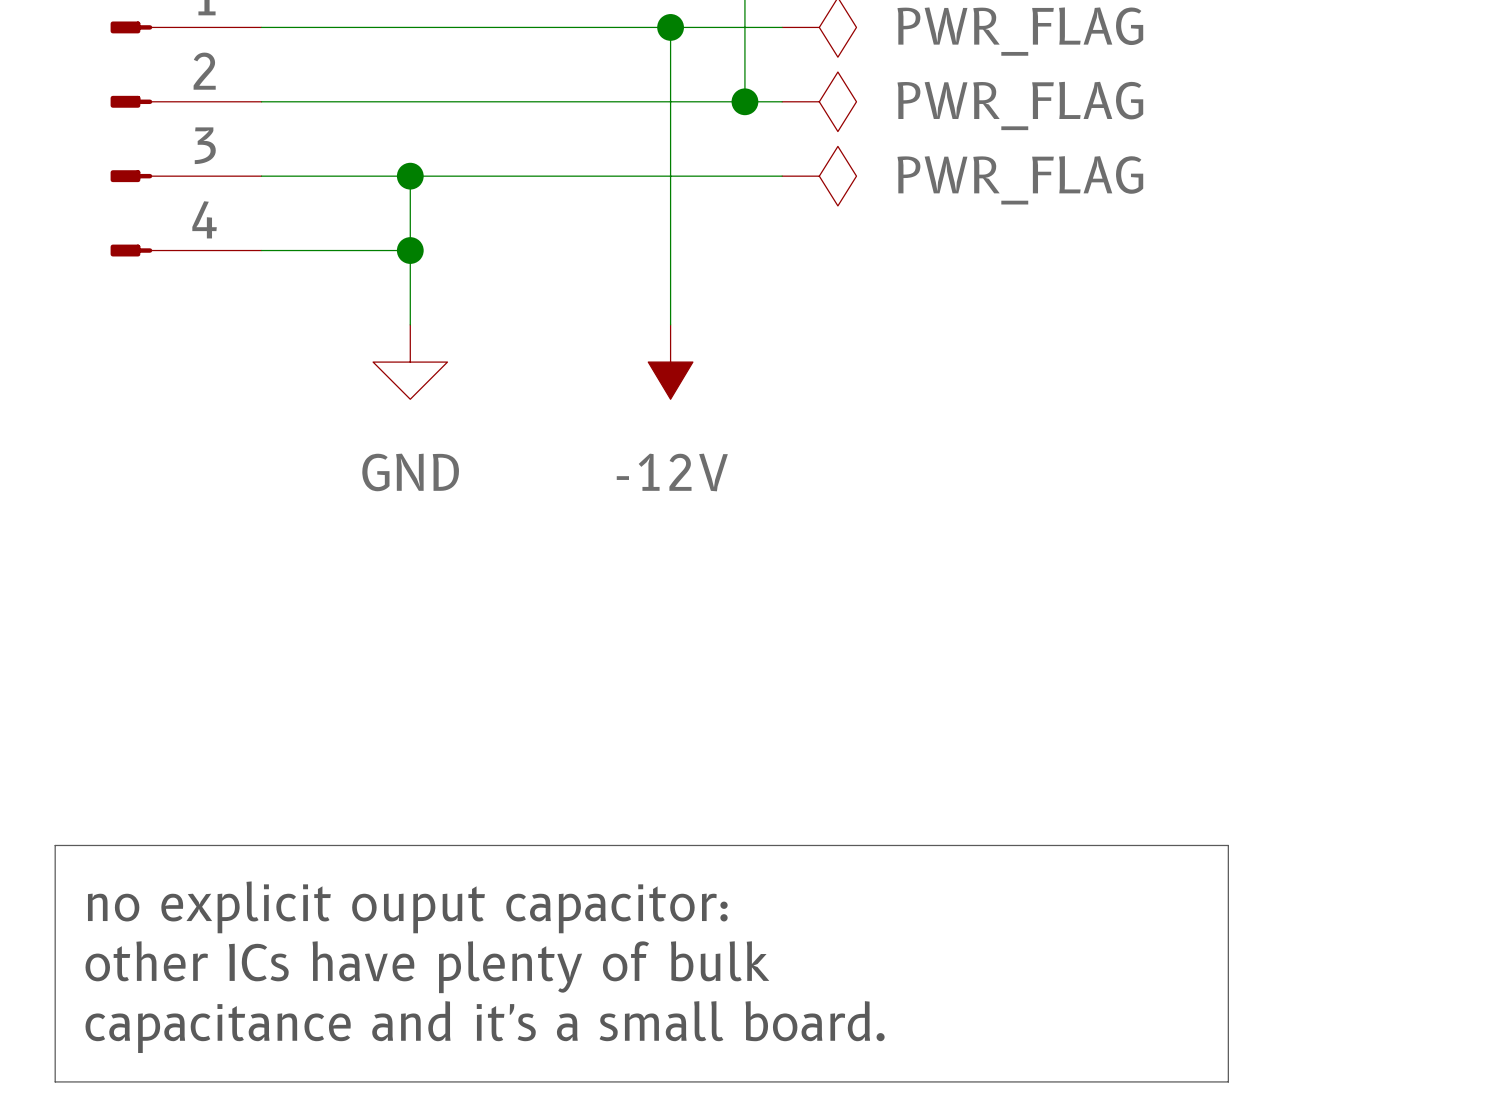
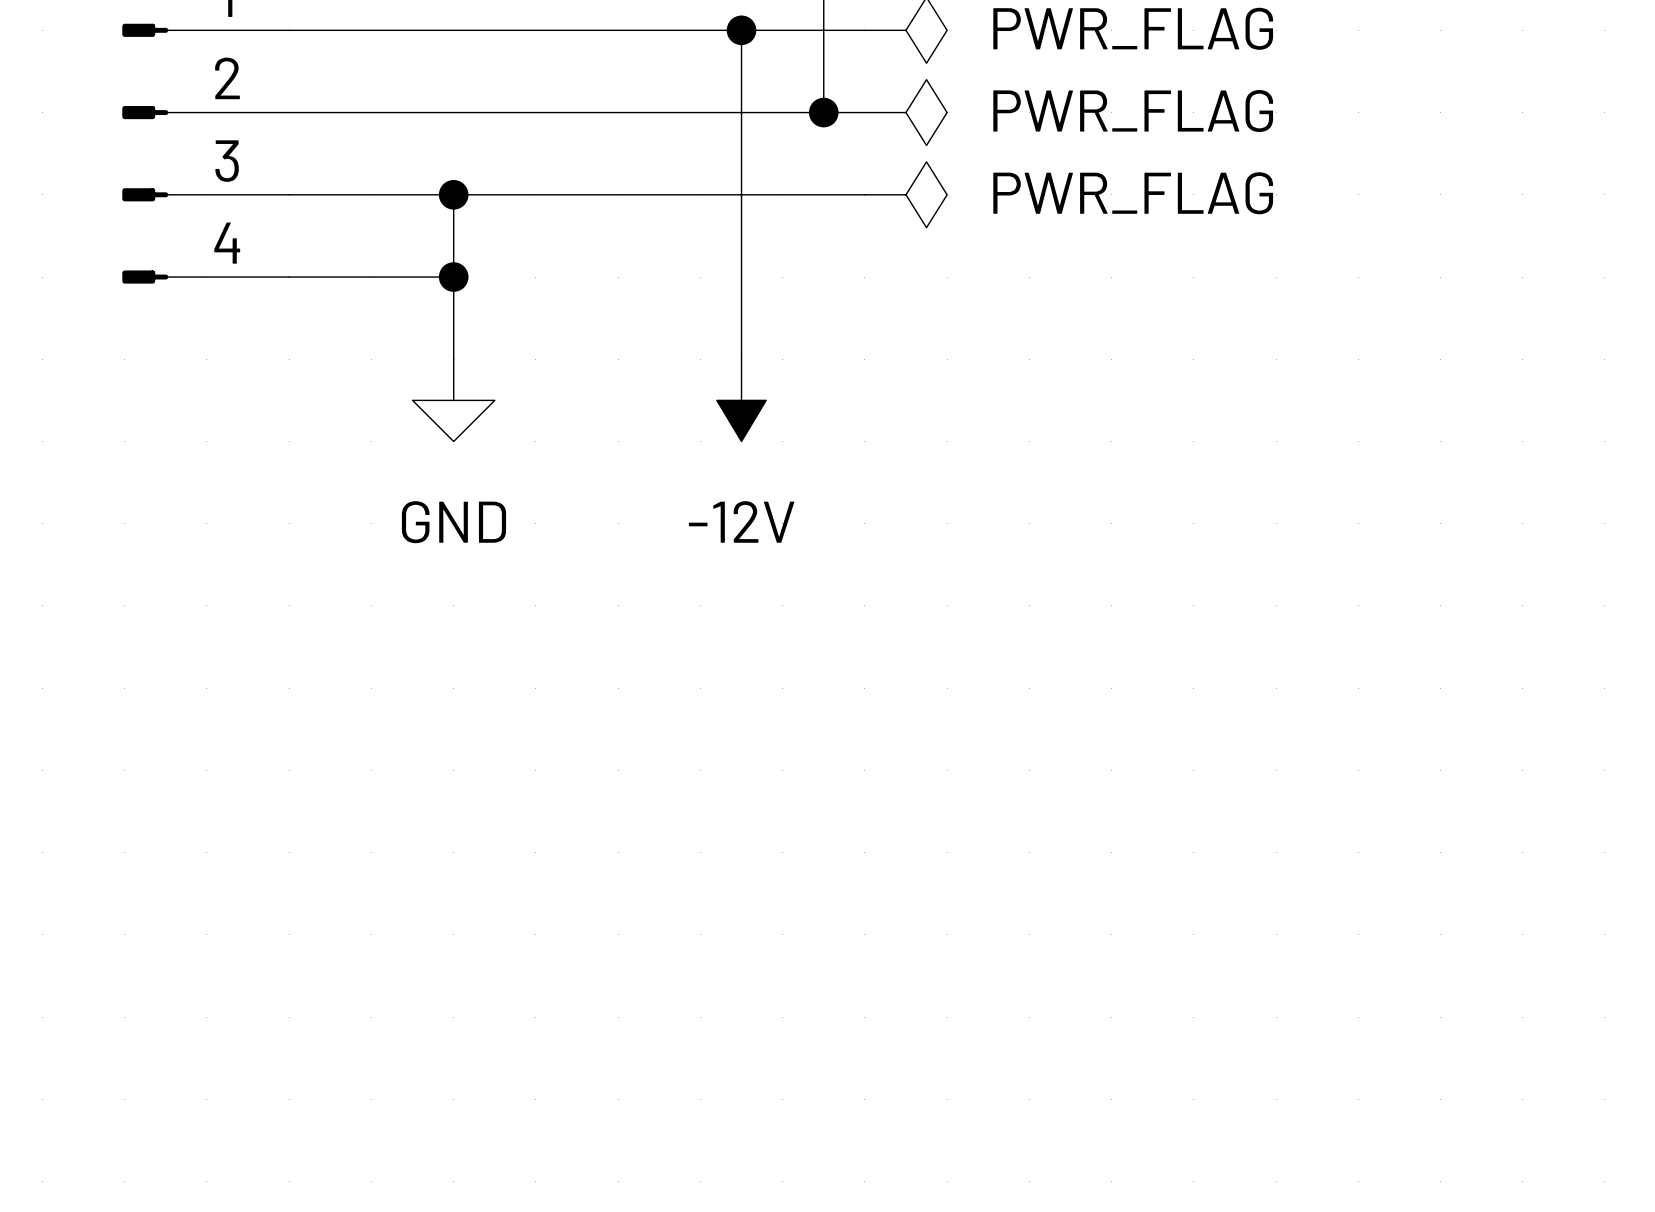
line: (55, 845) (1228, 845) (1228, 1081) (55, 1081) (55, 845) -> none
text: no explicit ouput capacitor: (407, 907) -> none
text: other ICs have plenty of bulk (427, 967) -> none
text: capacitance and it's a small board. (485, 1027) -> none

